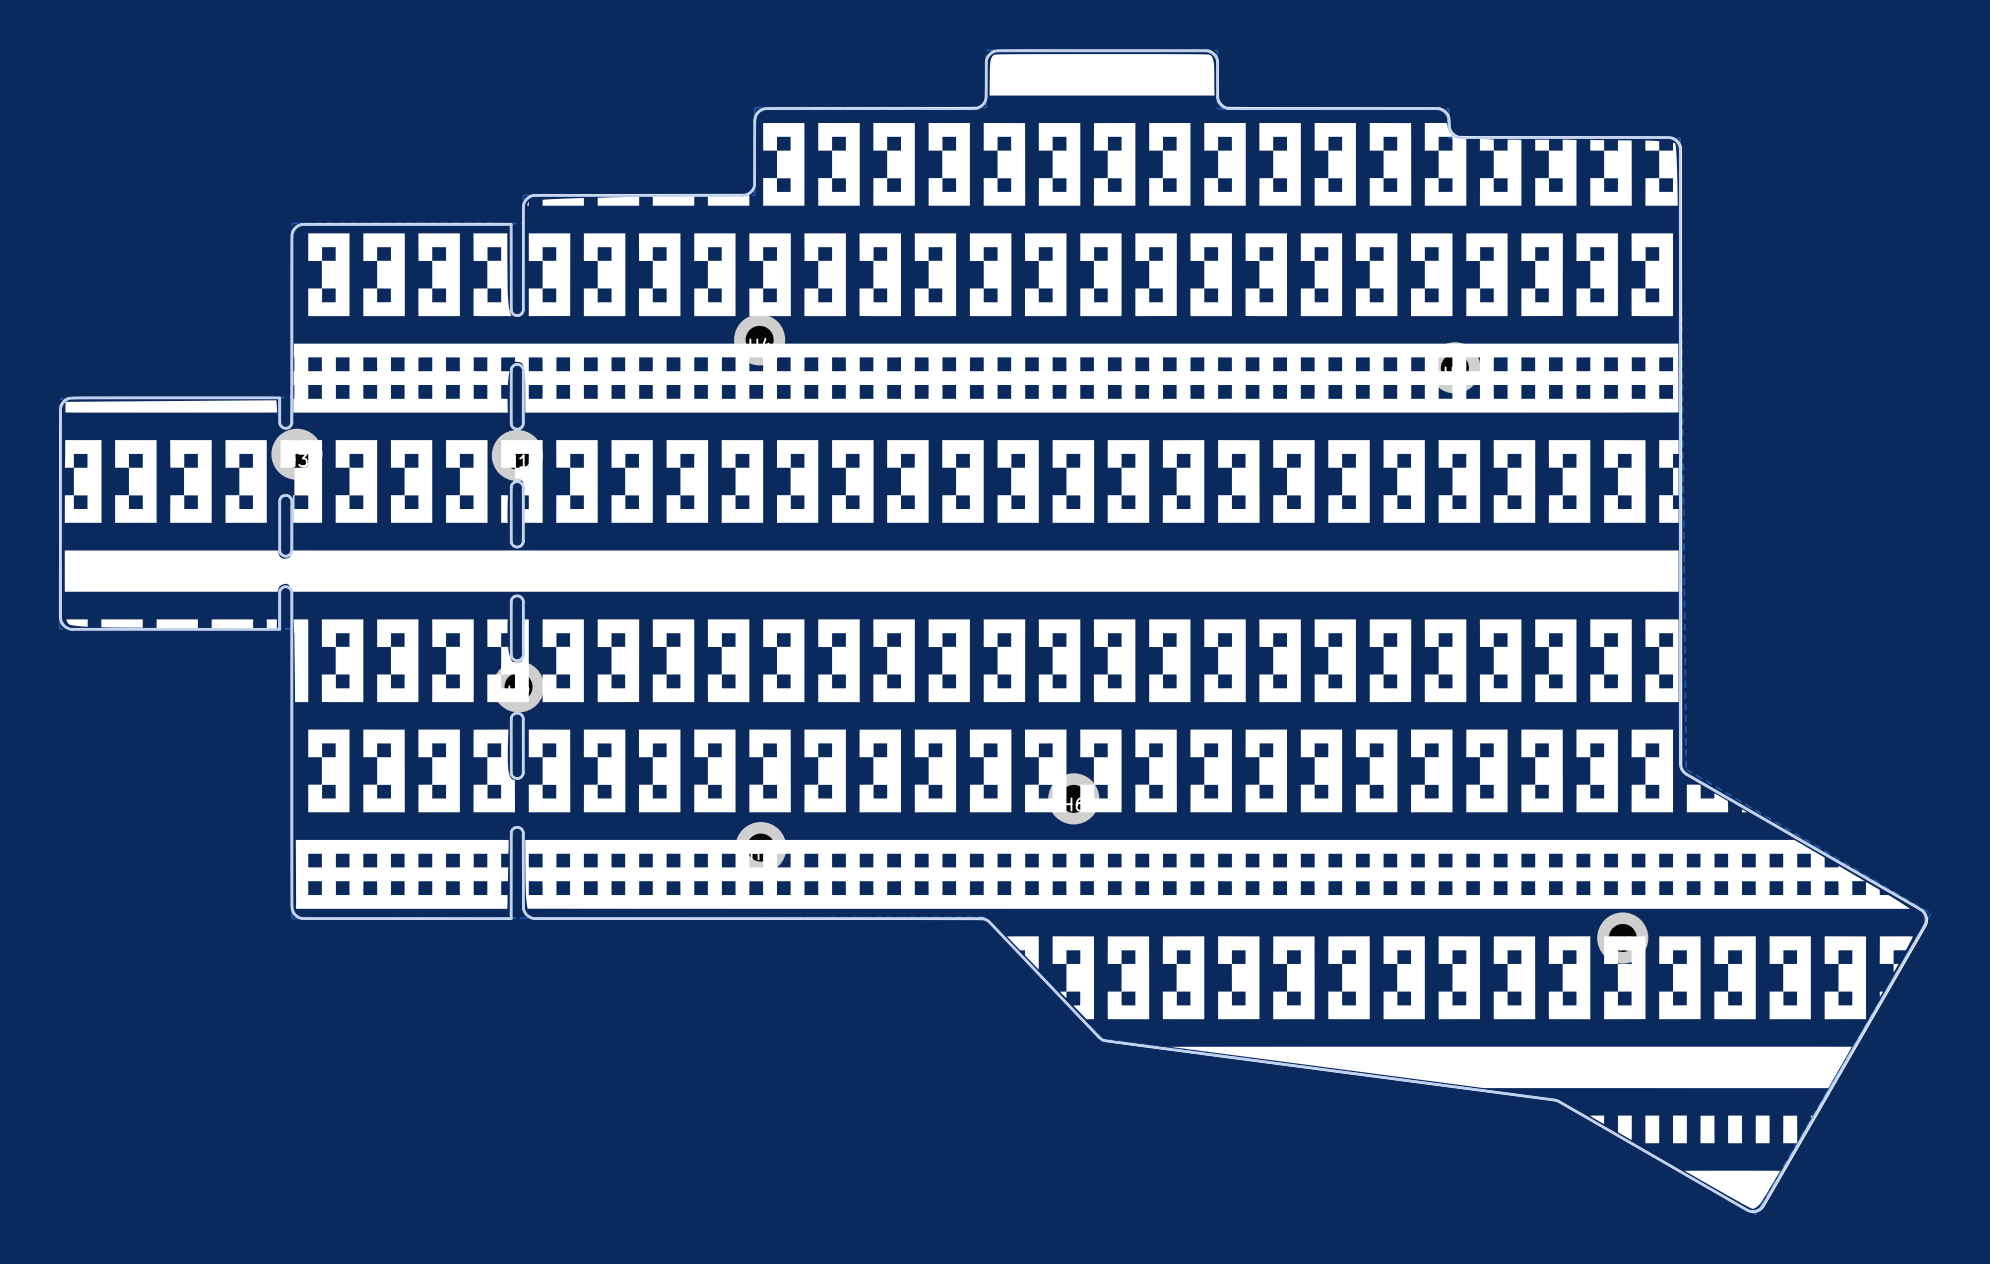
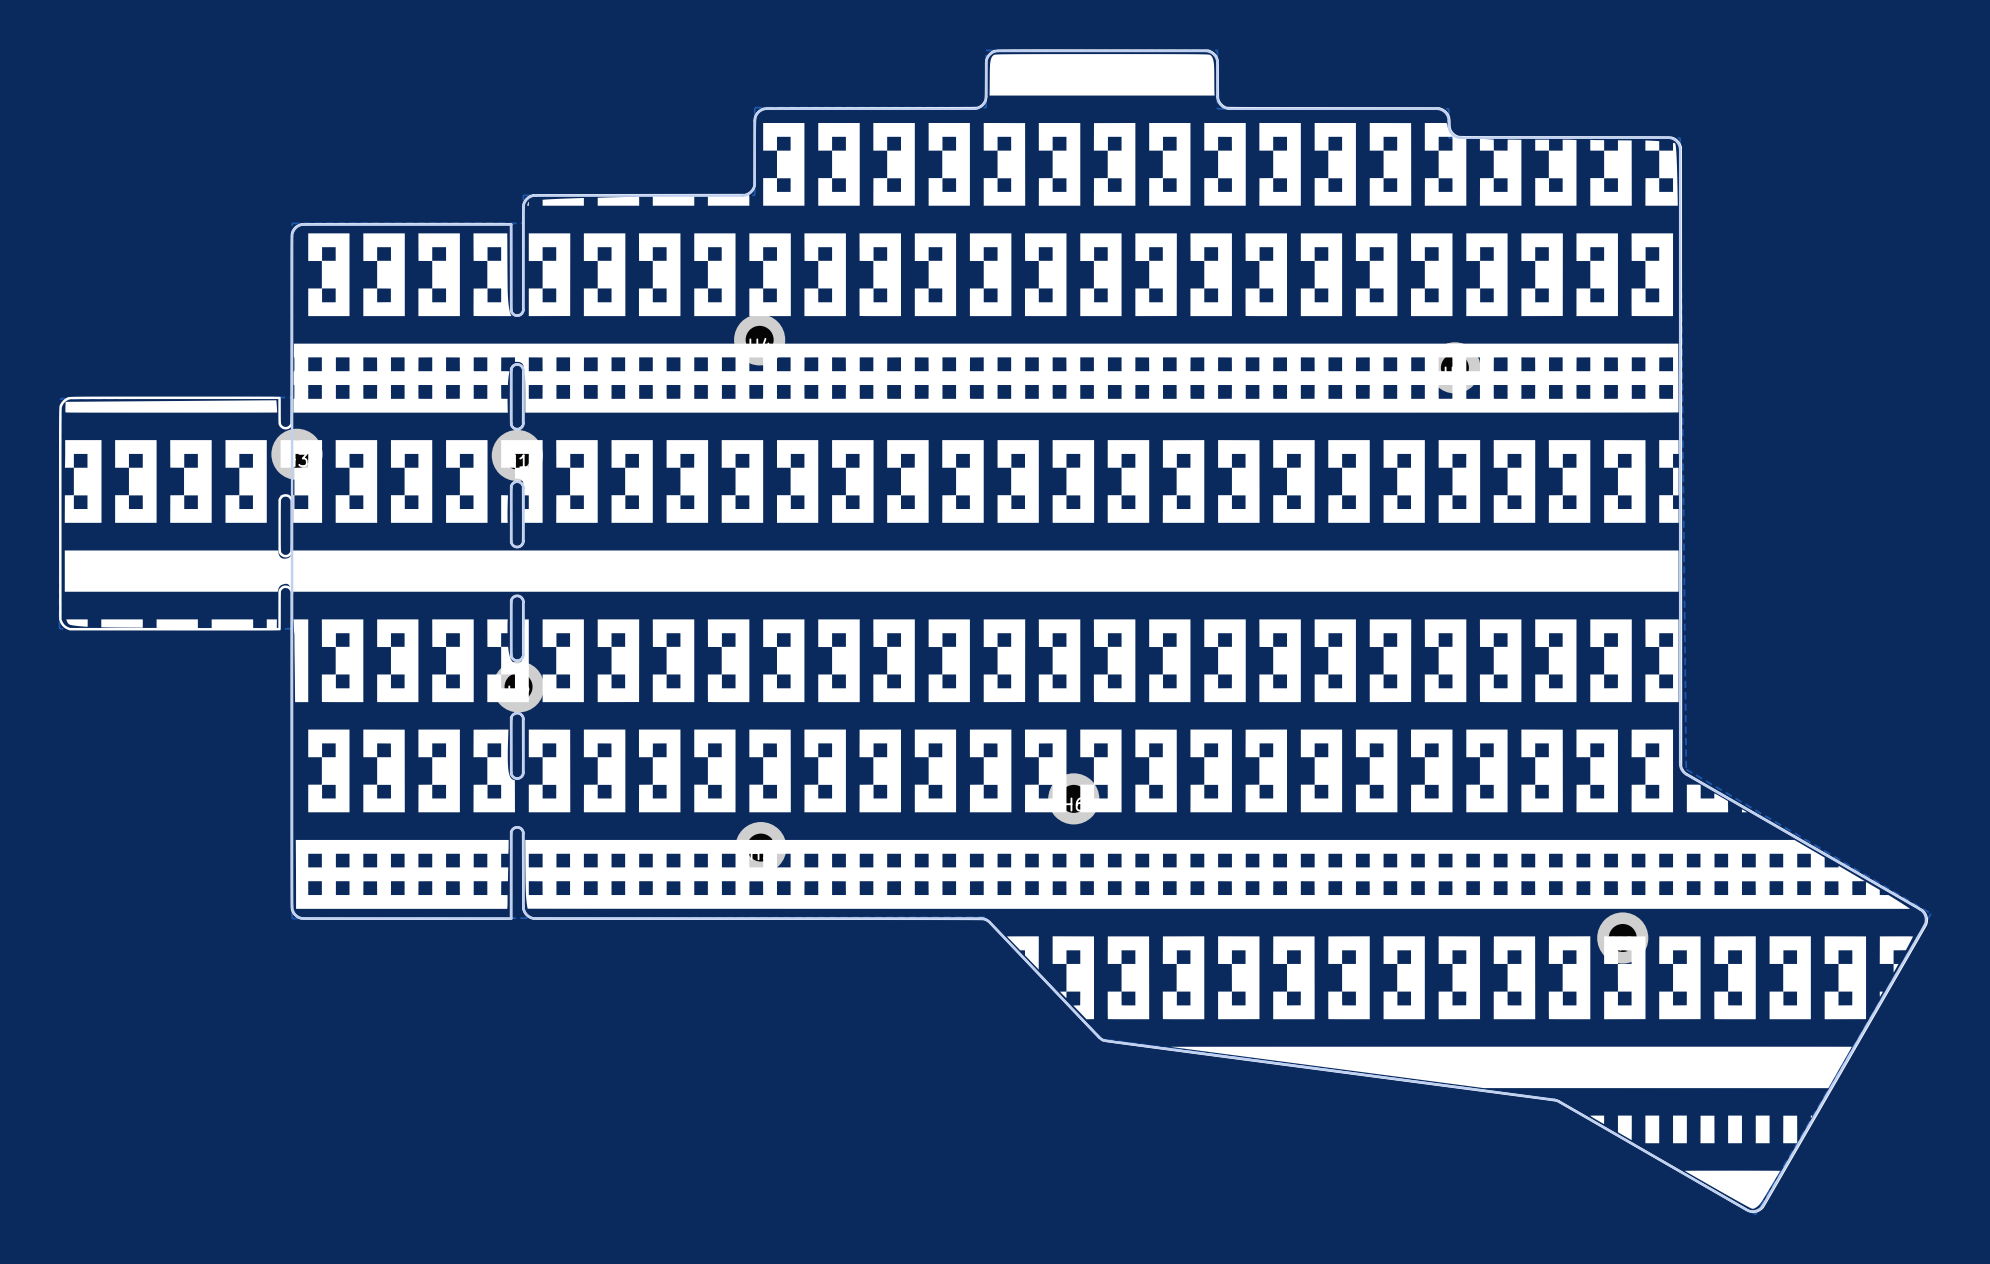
board edge: (292, 422) (287, 428) (280, 425) (279, 397) (72, 397) (65, 400) (60, 410) (60, 618) (64, 625) (72, 629) (279, 629) (280, 591) (286, 586) (292, 592) -> (292, 422) (292, 501)
board edge: (292, 501) (290, 497) (285, 495) (281, 497) (279, 501) (280, 551) (286, 556) (292, 550) -> (292, 592) (292, 550)

